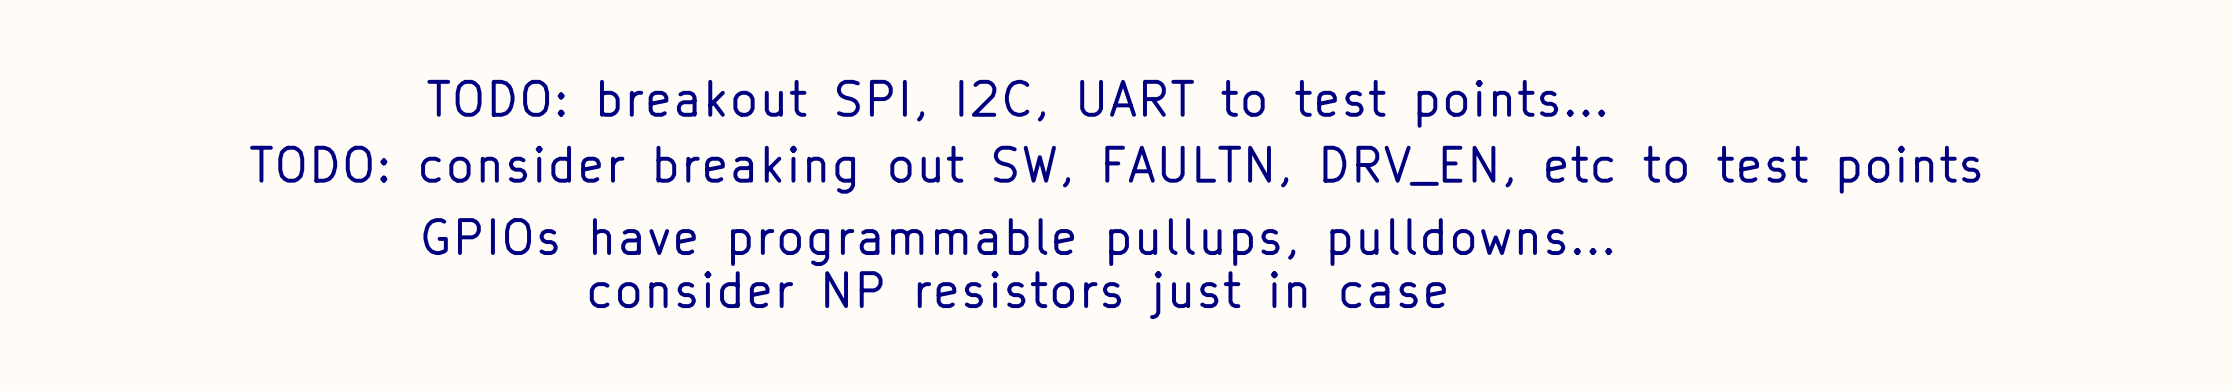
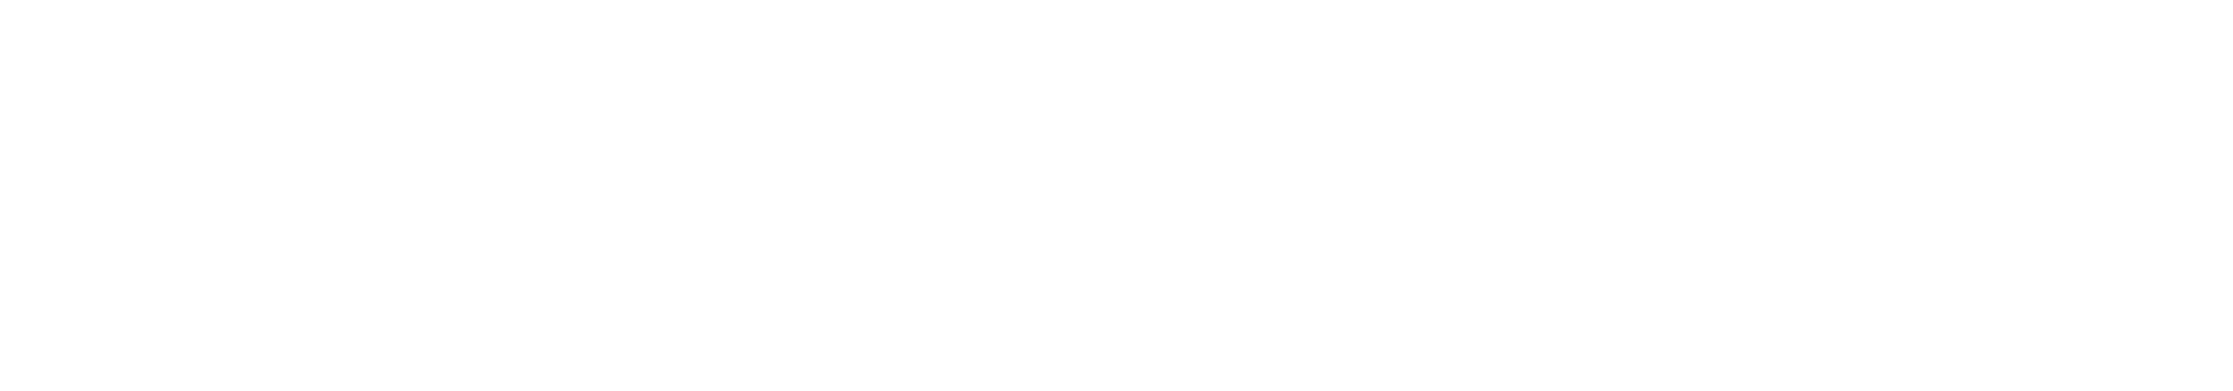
text: TODO: breakout SPI, I2C, UART to test points... (1016, 103) -> none
text: TODO: consider breaking out SW, FAULTN, DRV_EN, etc to test points (1115, 169) -> none
text: GPIOs have programmable pullups, pulldowns... (1017, 242) -> none
text: consider NP resistors just in case (1017, 295) -> none

